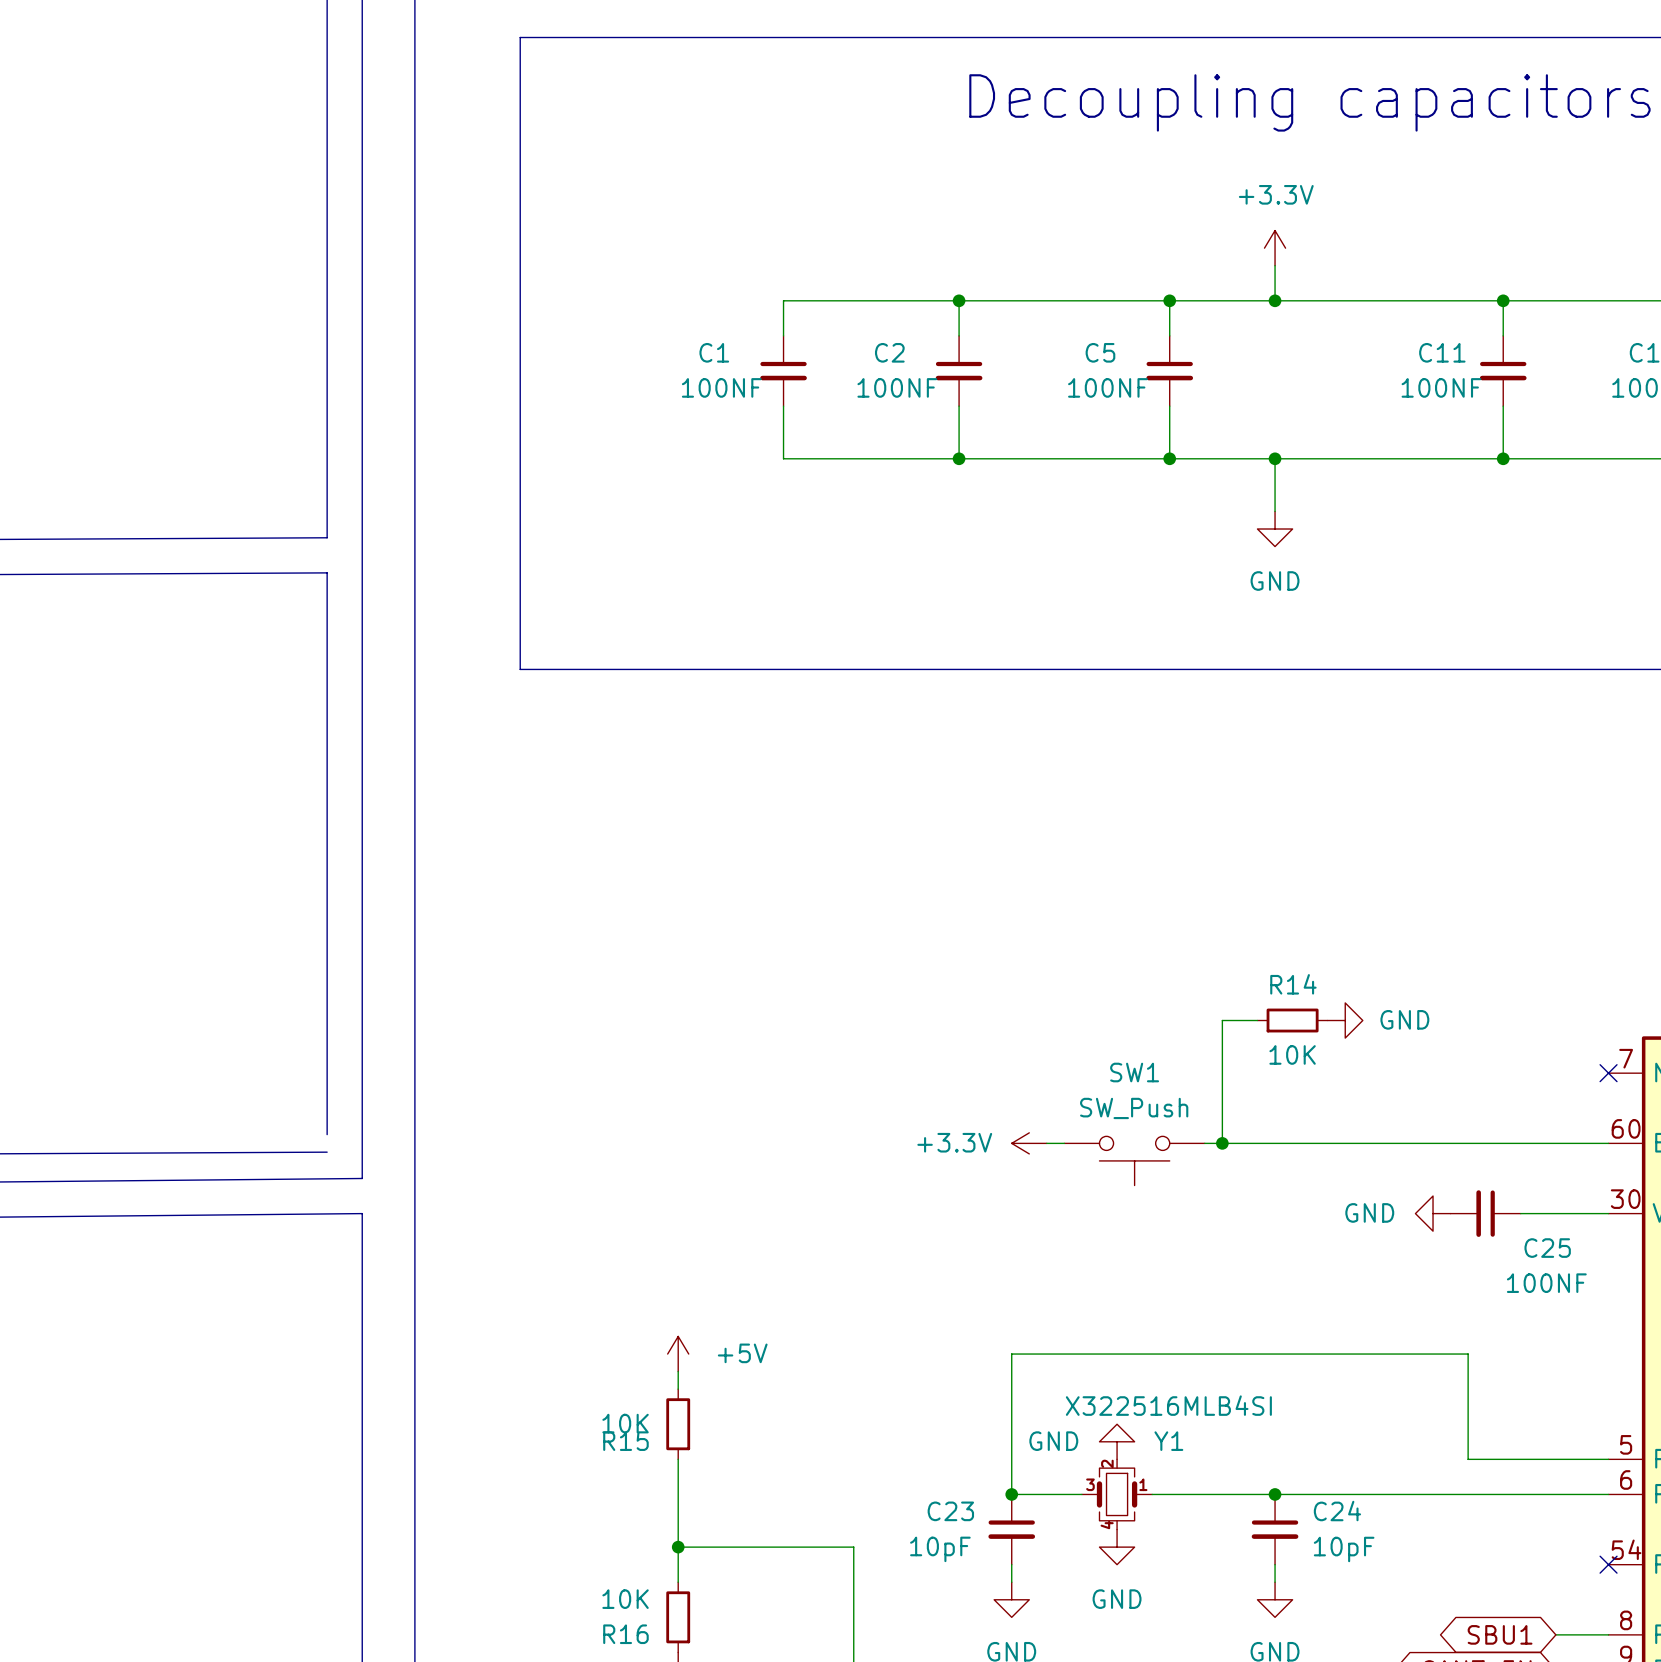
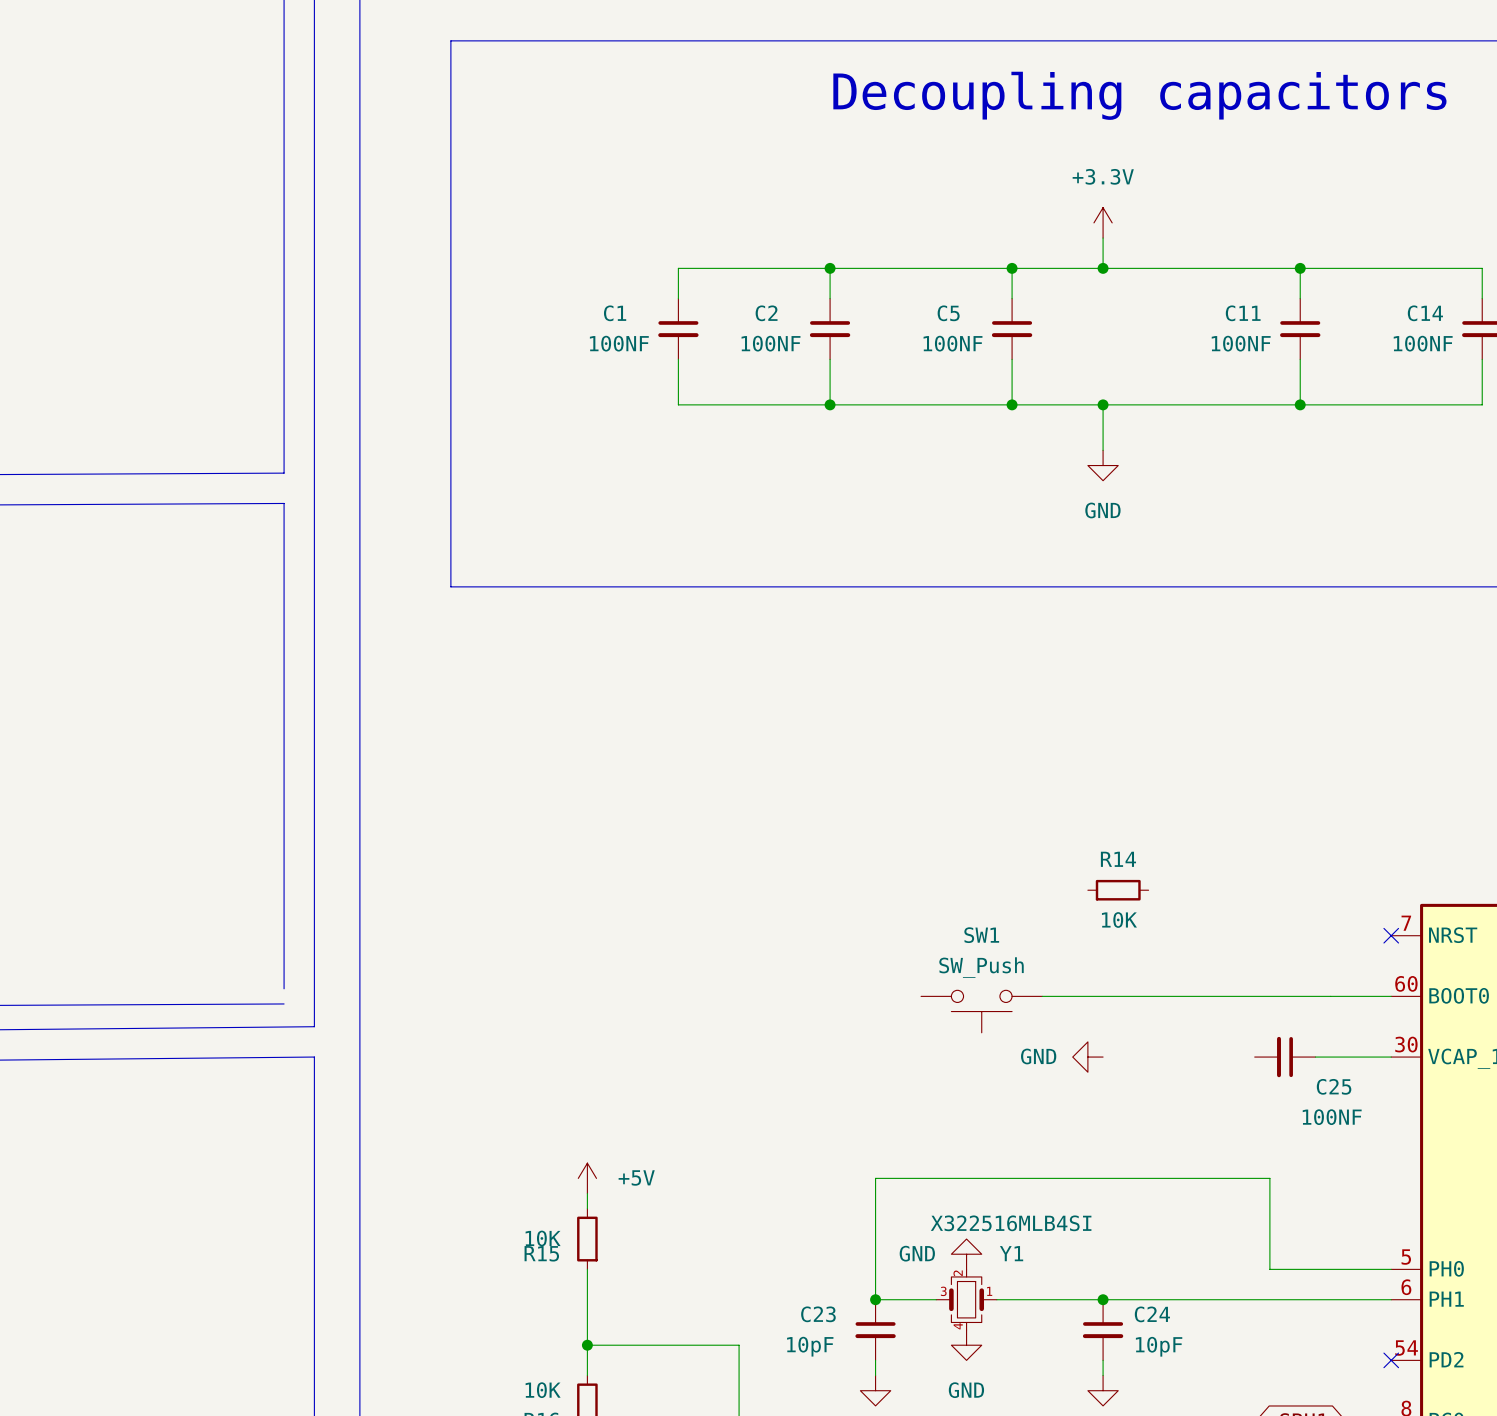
wire: (1257, 1020) (1222, 1020) (1222, 1143) -> none
power symbol: GND (1345, 1020) -> none
power symbol: +3.3V (1029, 1143) -> none
wire: (1046, 1143) (1064, 1143) -> none
junction: (1222, 1143) -> none
power symbol: none -> GND (1087, 1057)
power symbol: GND (1433, 1213) -> none

